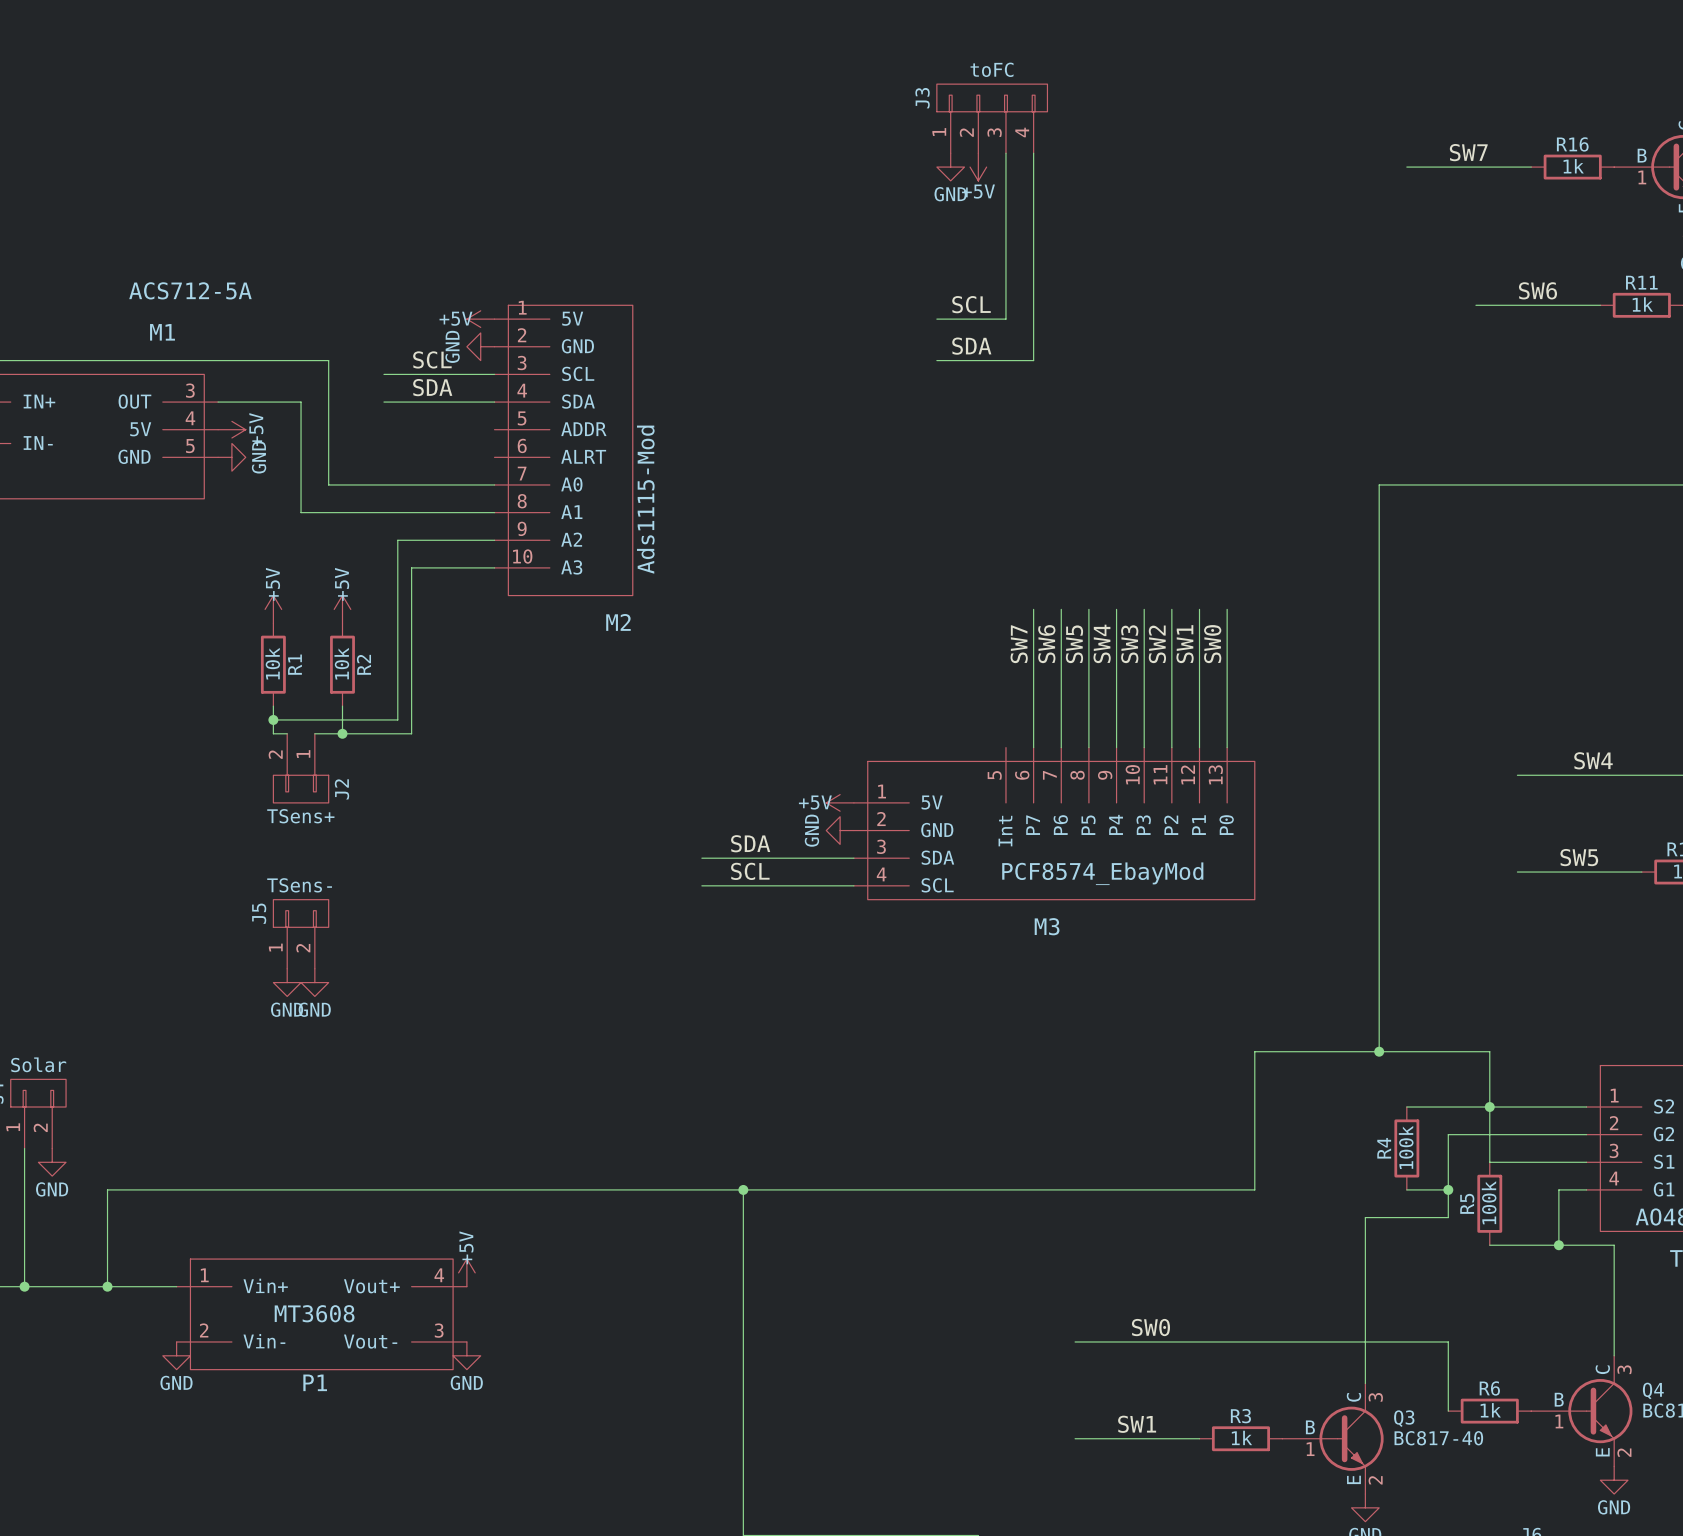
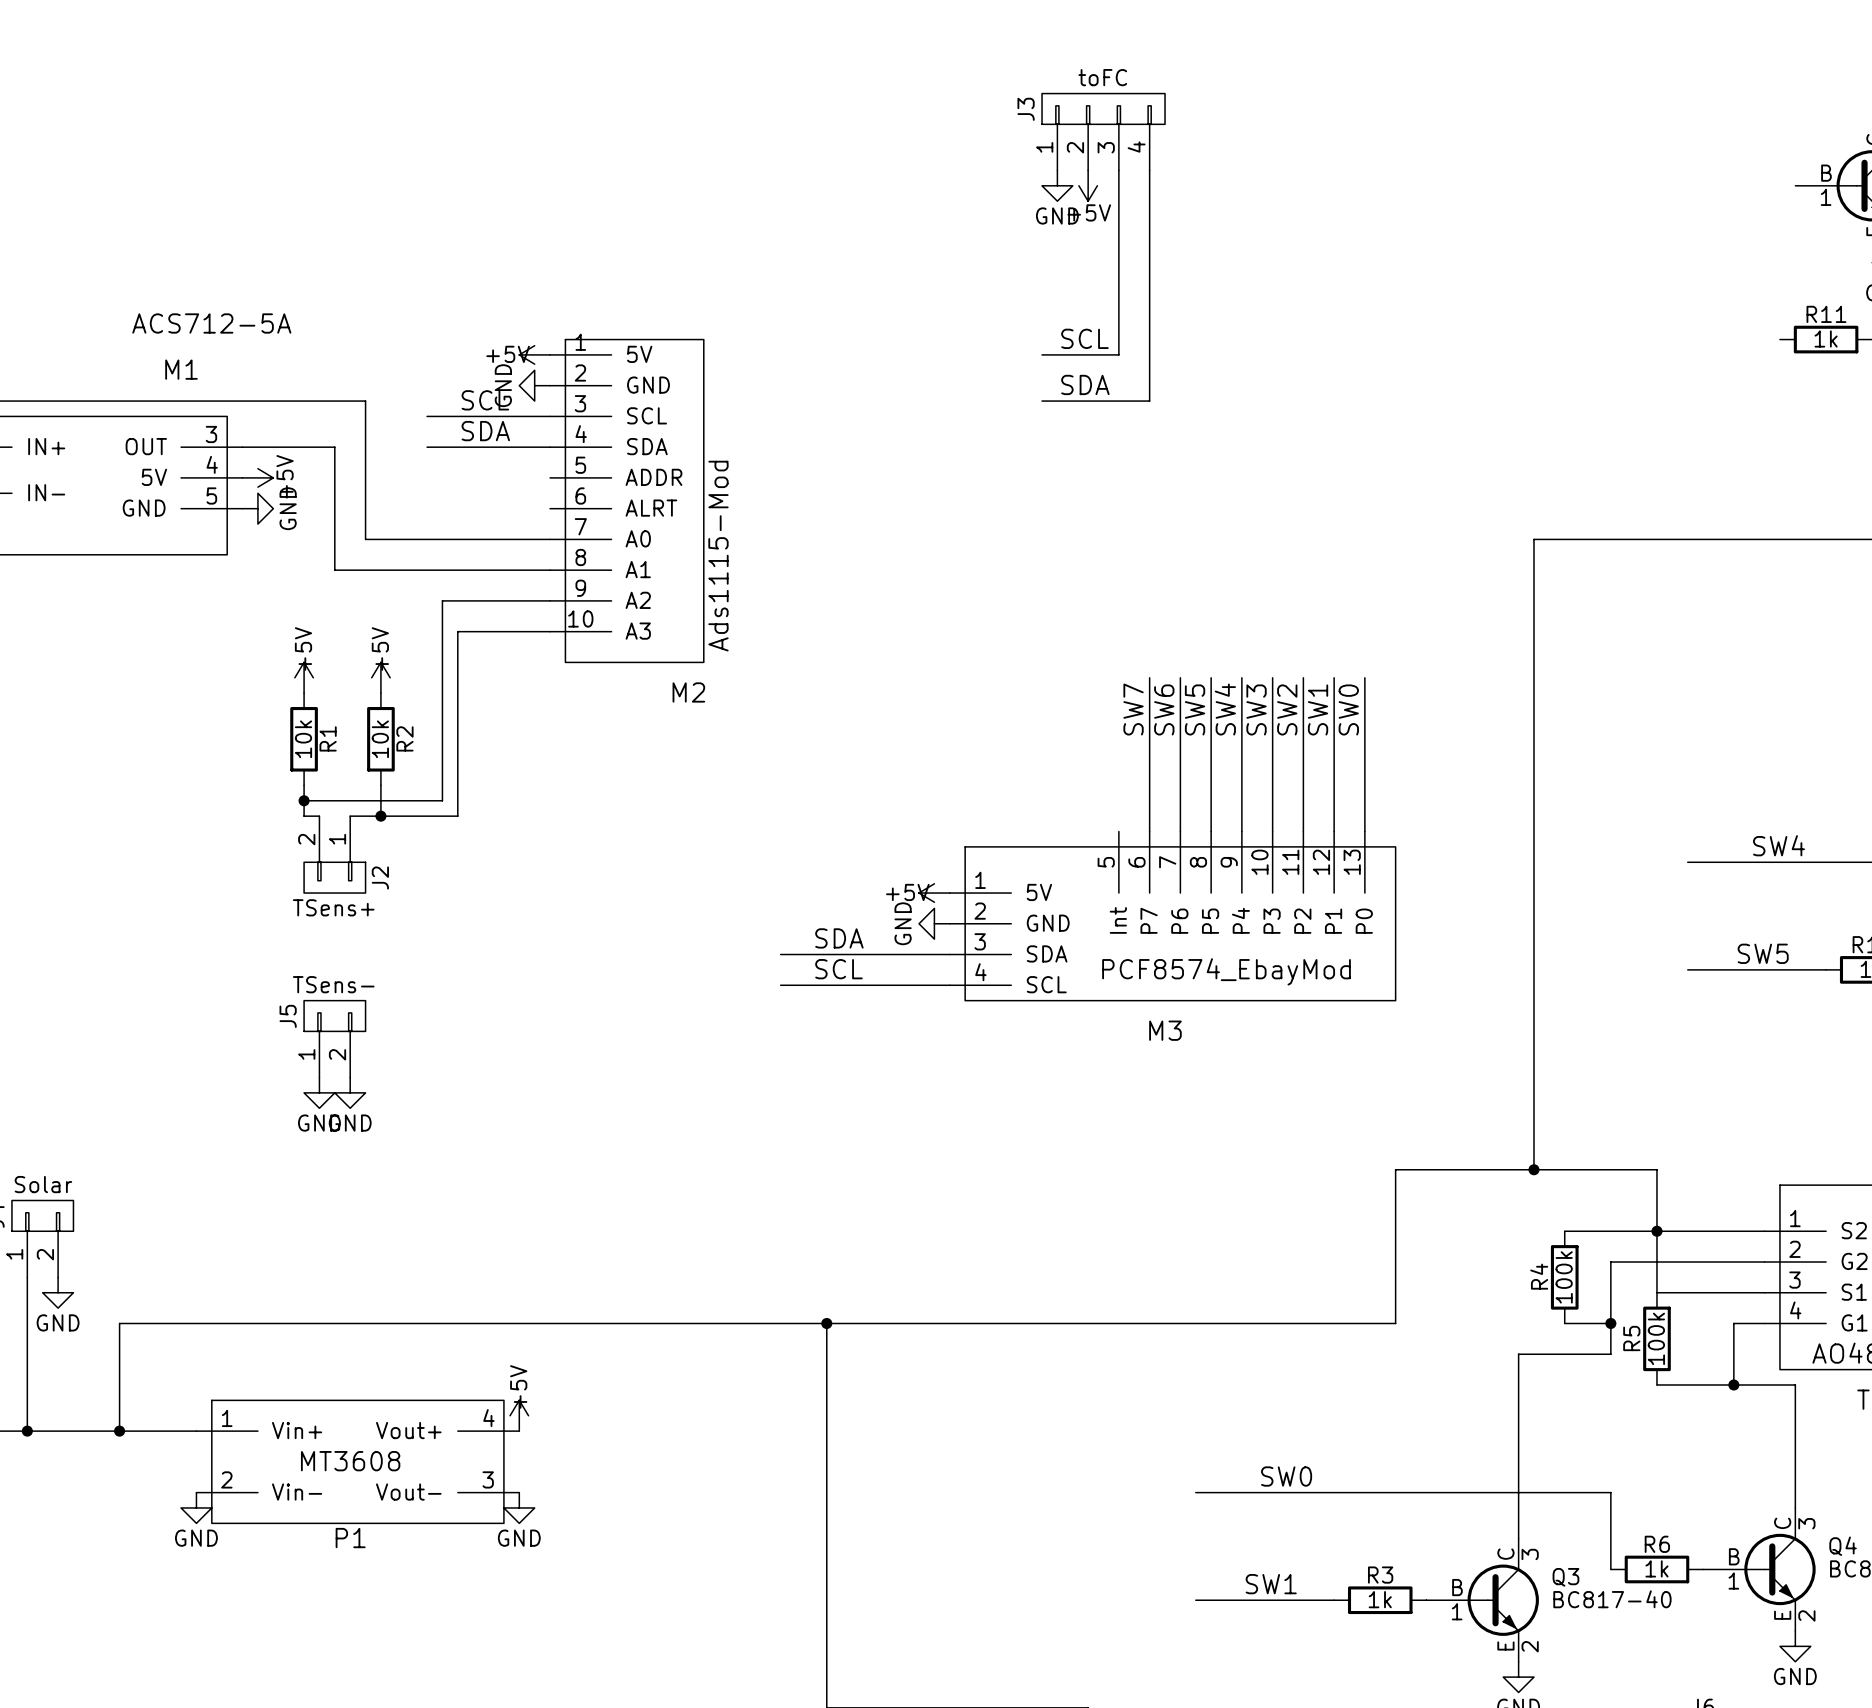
label: SW7 (1468, 152) -> none
wire: (1406, 167) (1531, 167) -> none
R16: 1k (1572, 167) -> none
label: SW6 (1538, 290) -> none
wire: (1475, 305) (1600, 305) -> none

